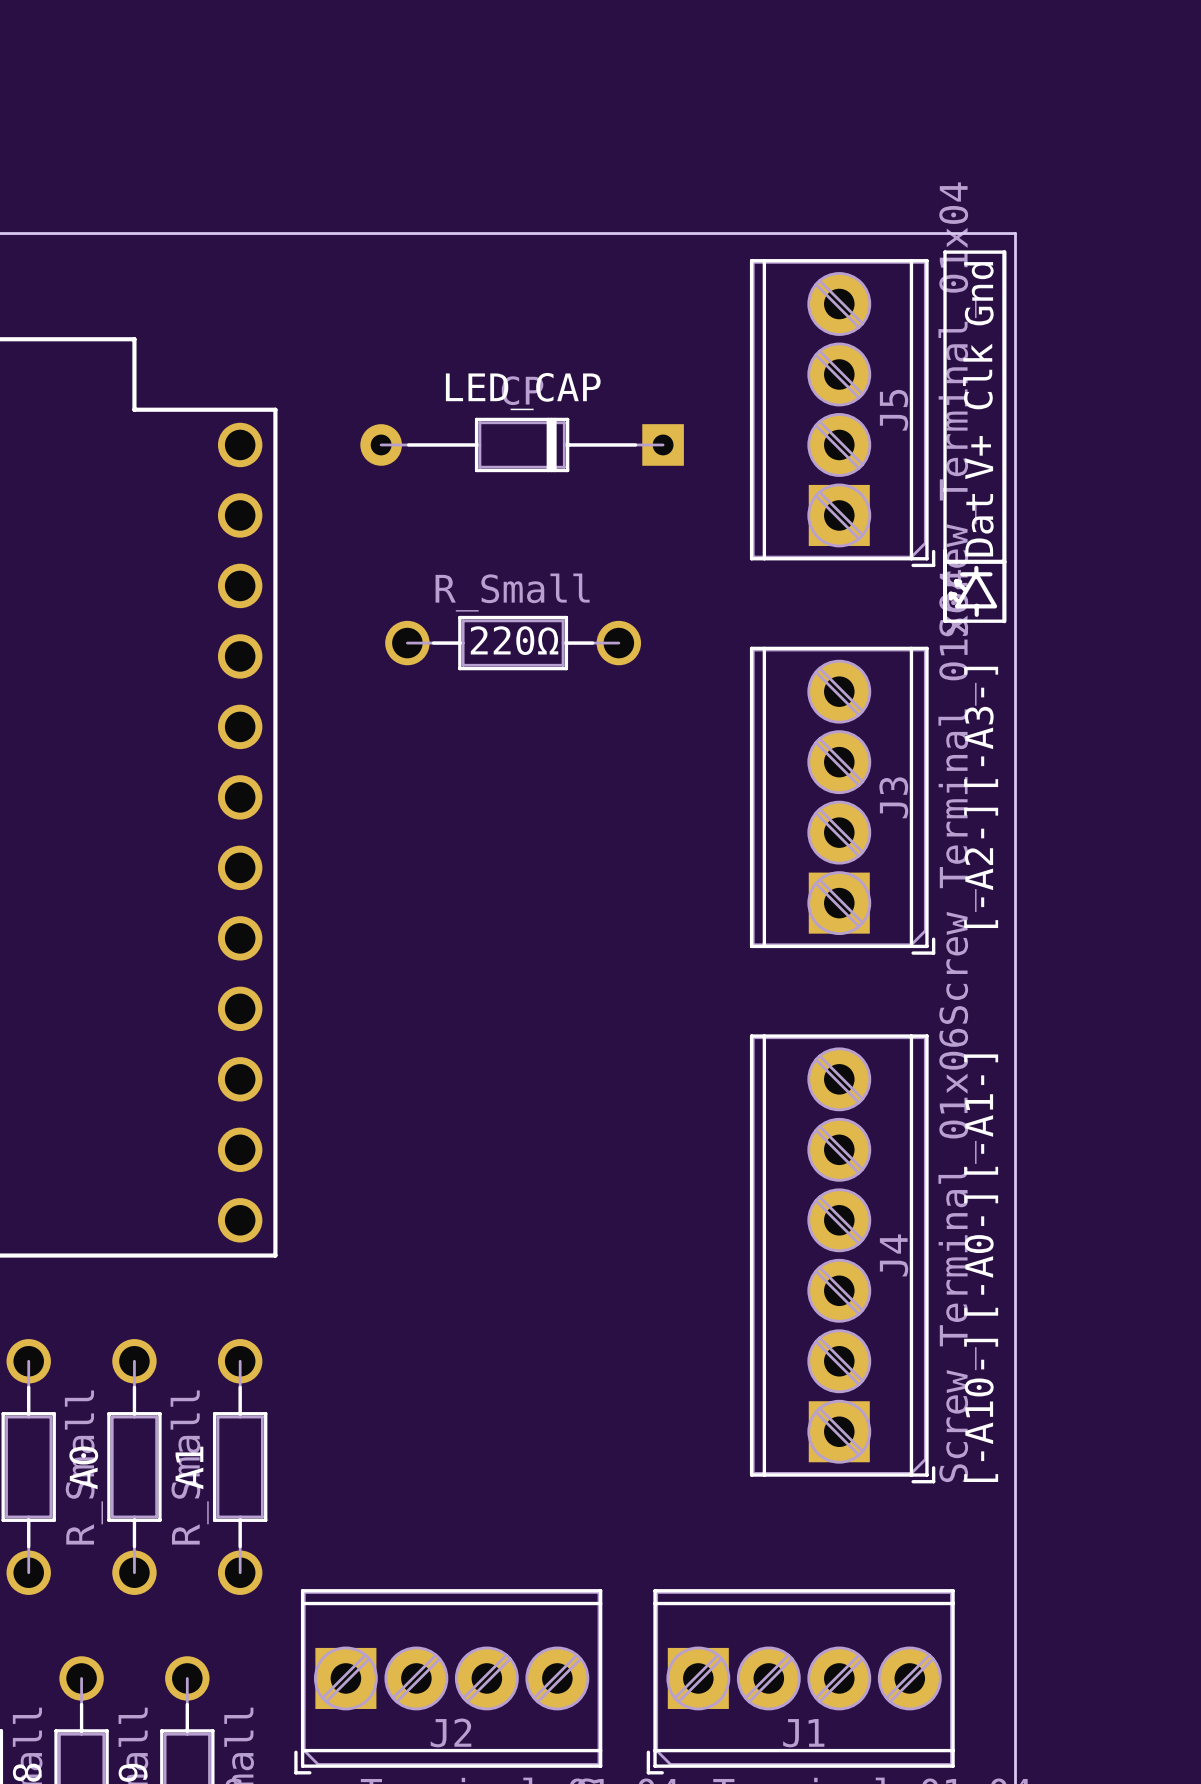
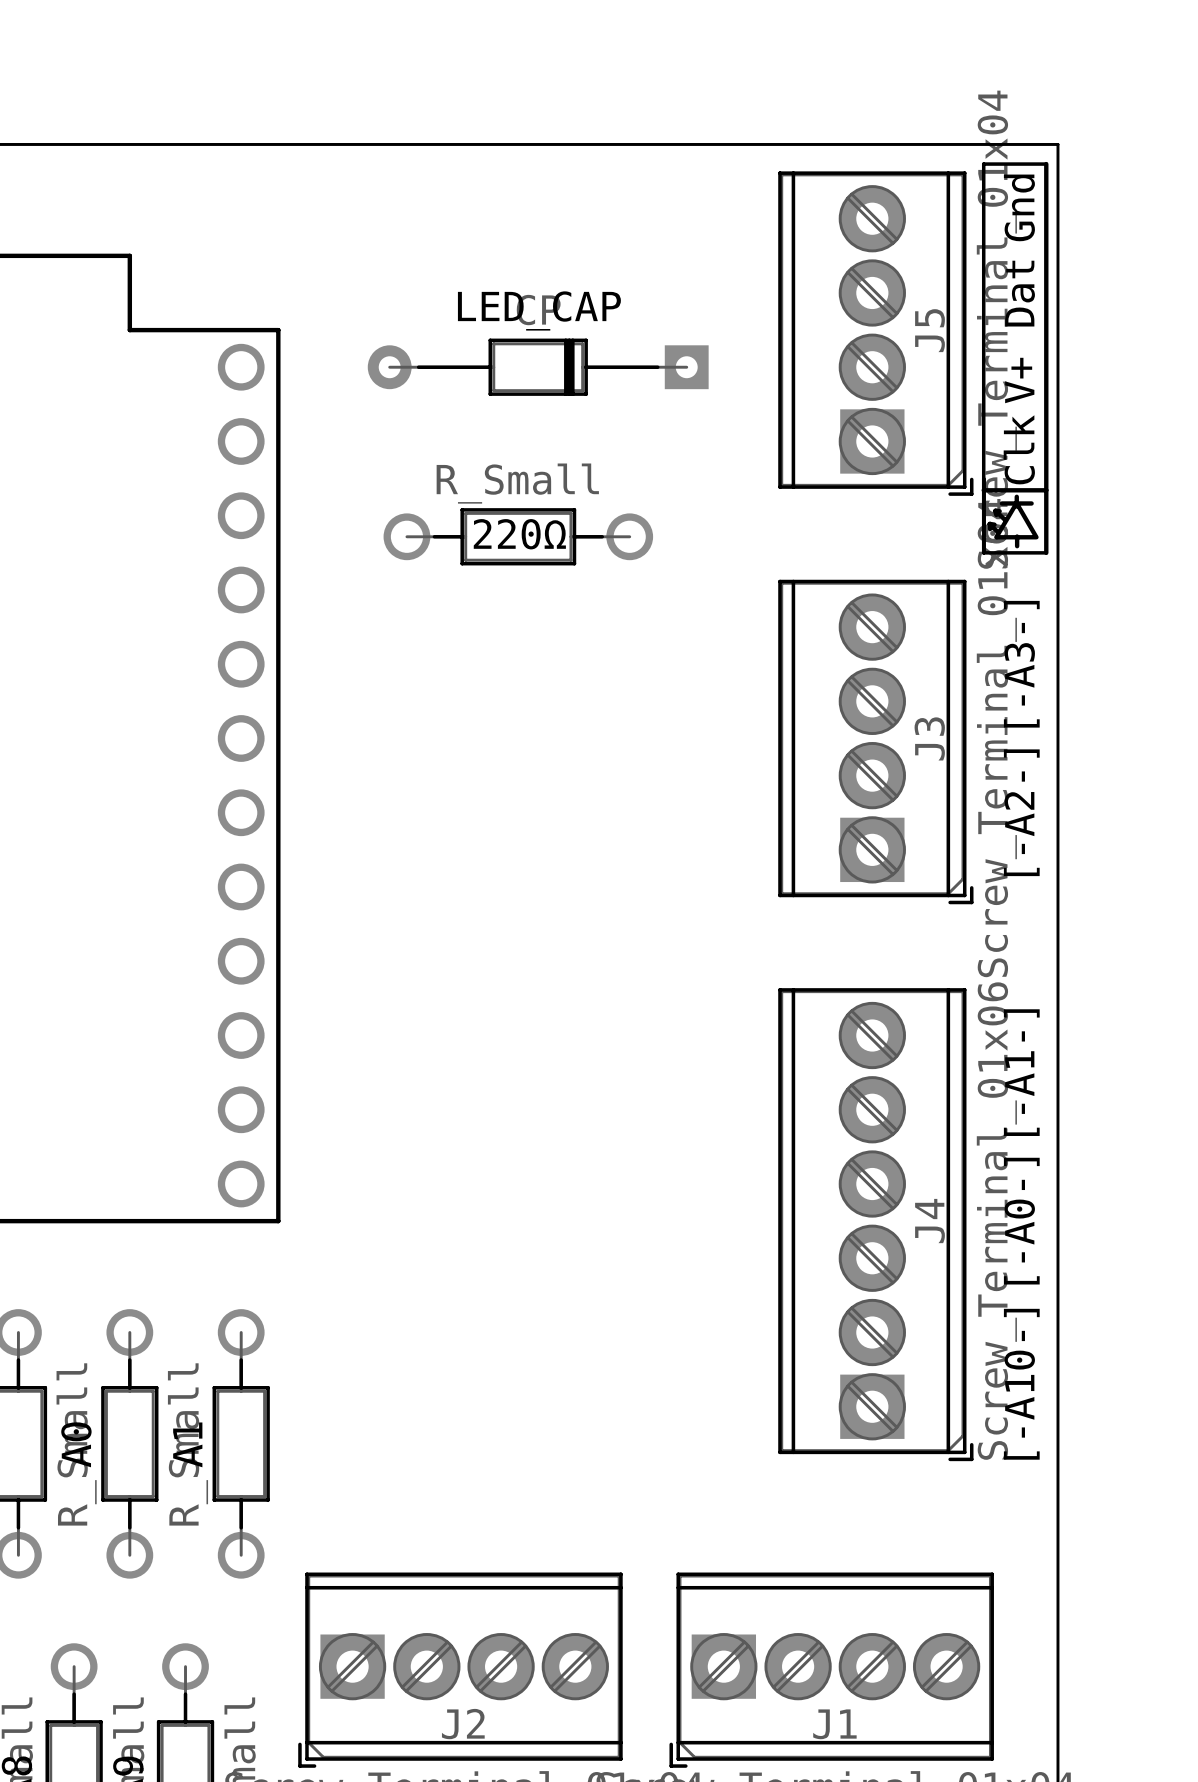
text position: Clk (977, 376) -> Clk (1019, 449)
text position: Dat (979, 525) -> Dat (1020, 293)
220Ω position: (513, 643) -> (518, 536)

